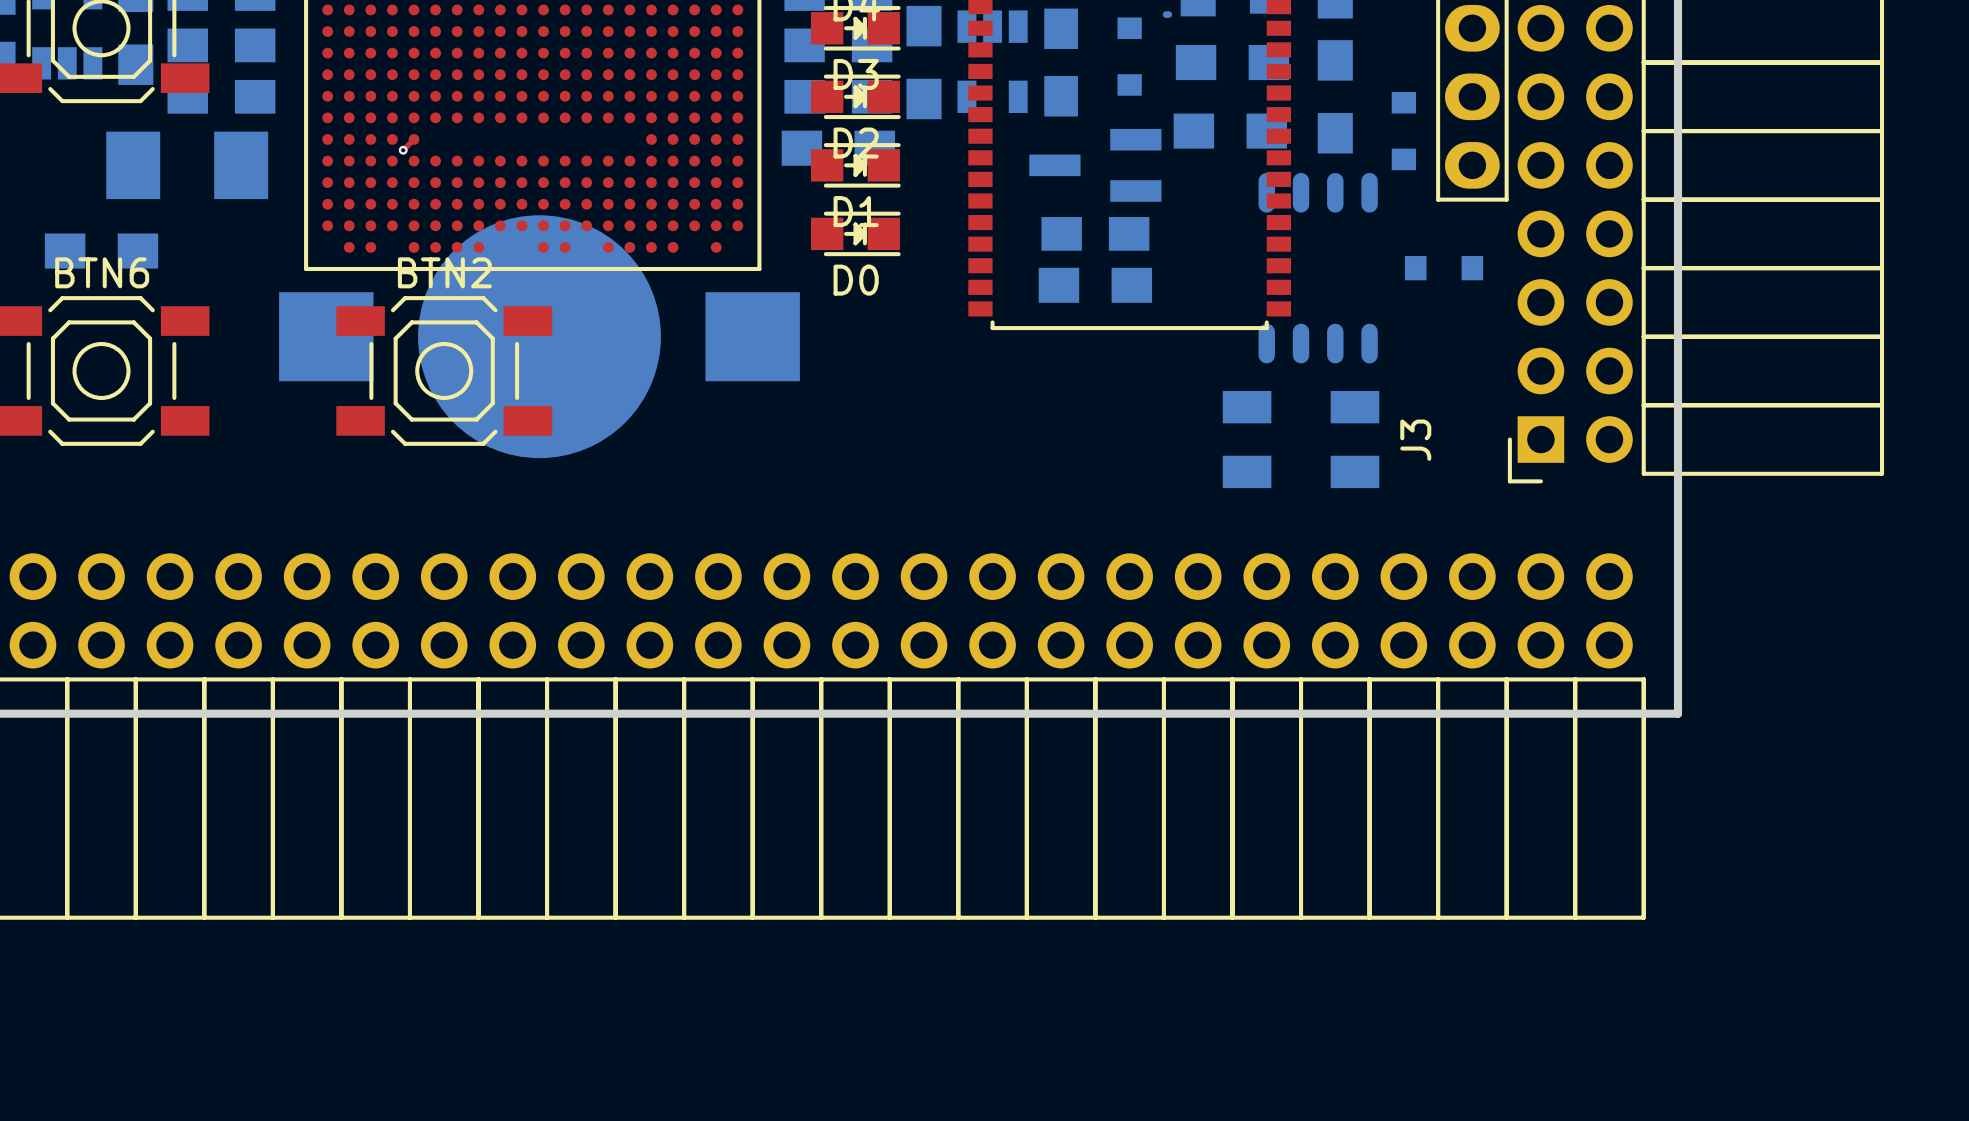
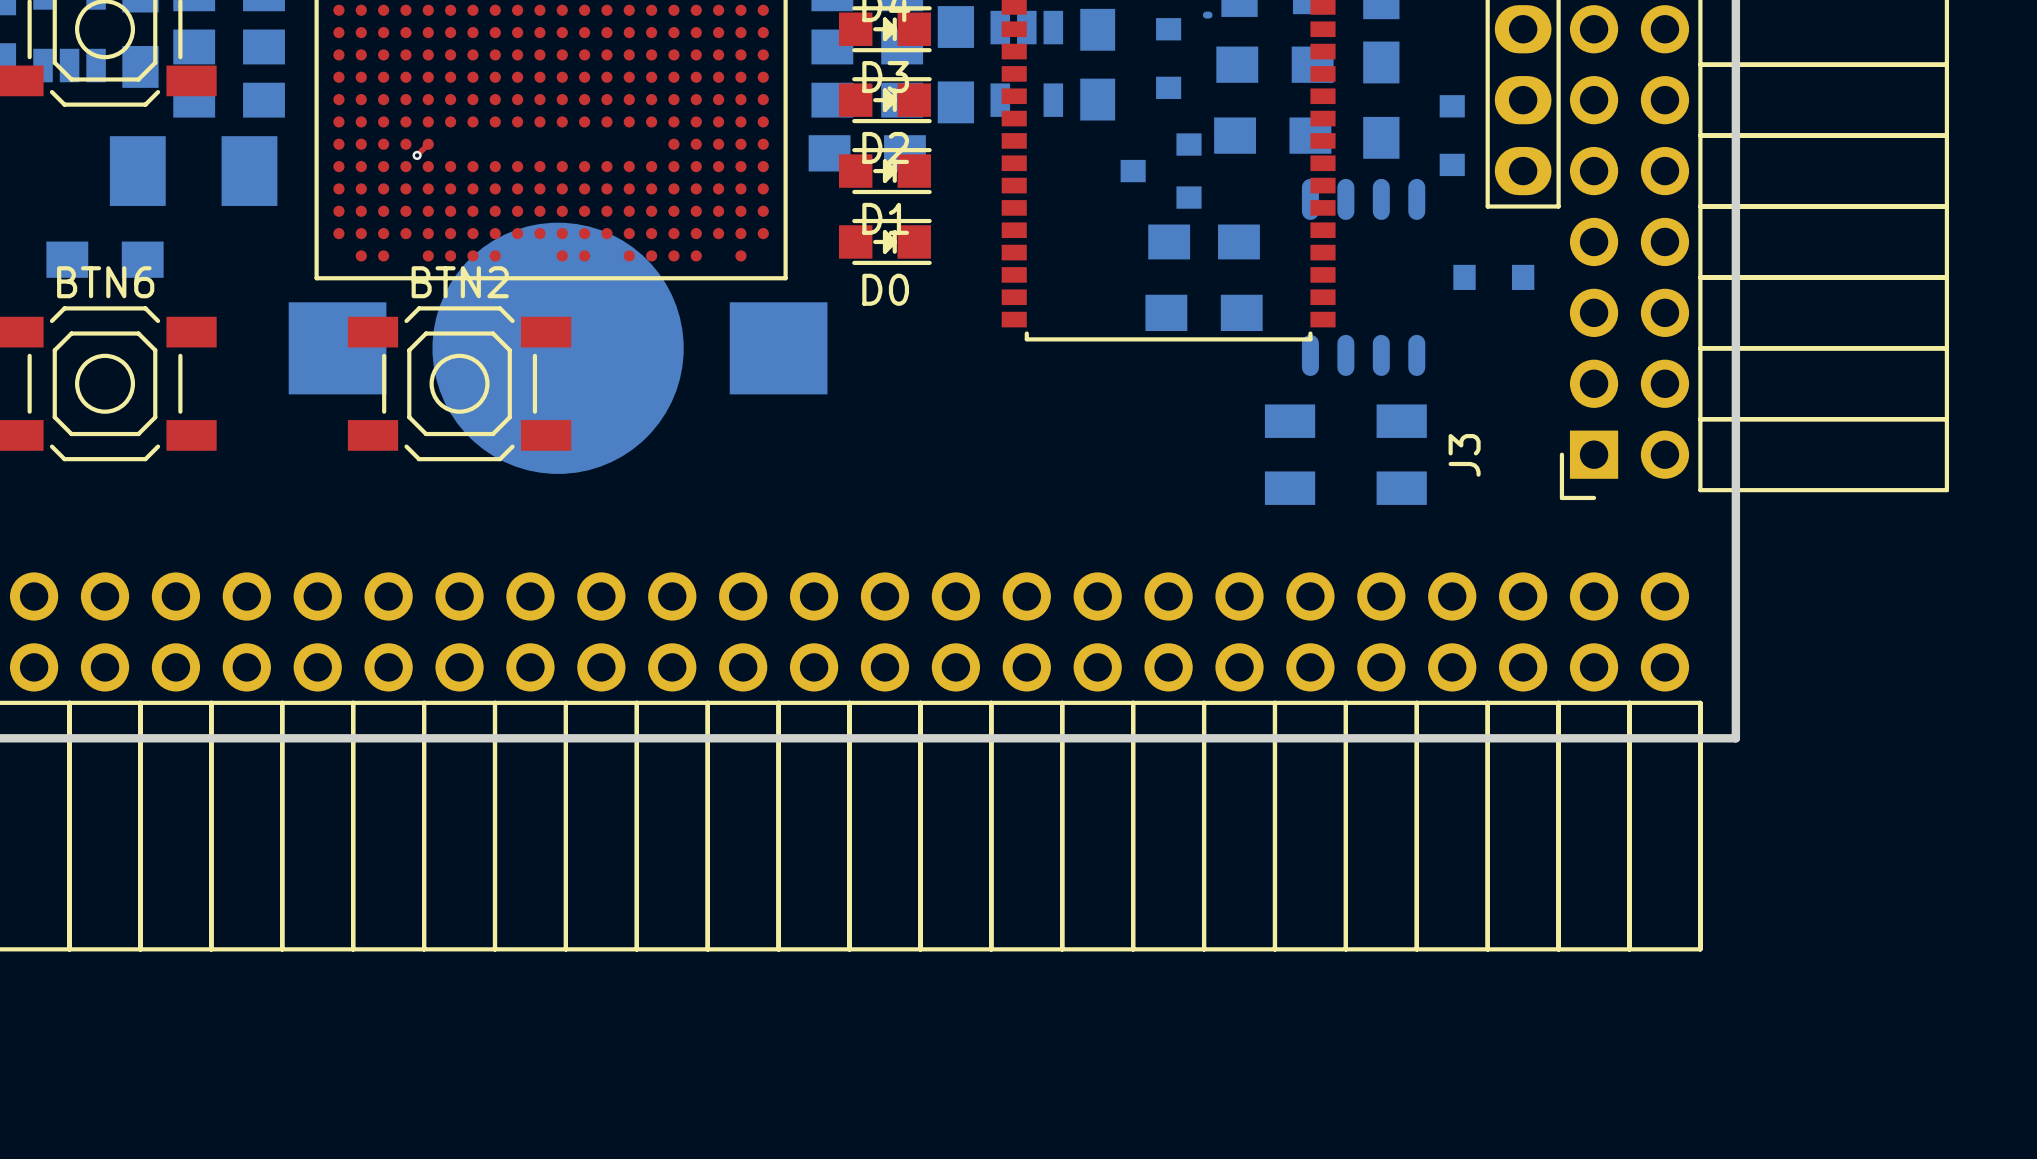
part footprint: [1029, 128, 1162, 202] -> [1120, 133, 1202, 209]
part position: (1095, 233) -> (1204, 241)
part position: (1095, 285) -> (1204, 312)

